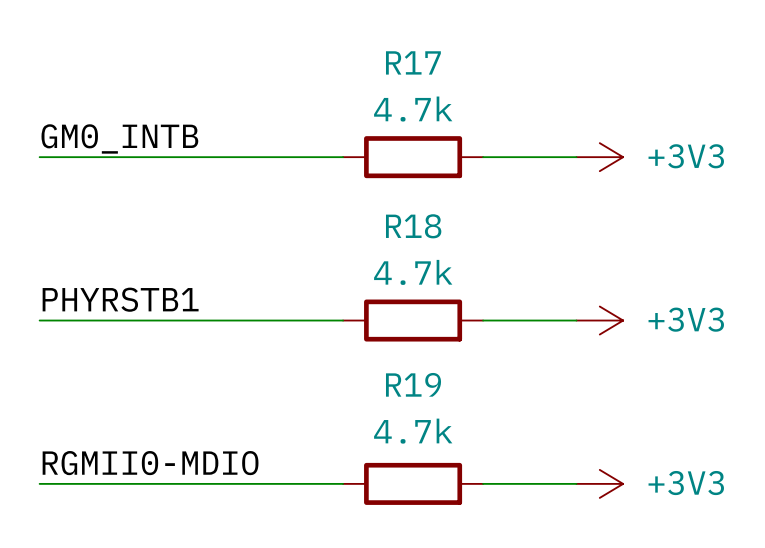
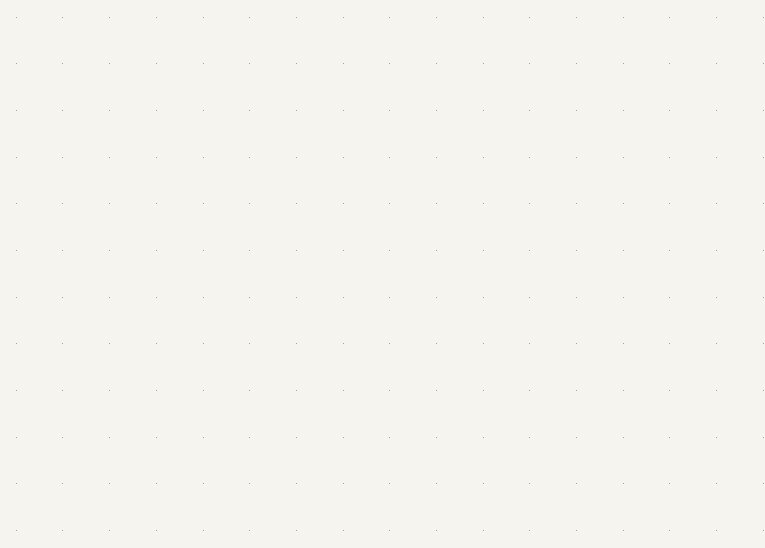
label: GM0_INTB (119, 138) -> none
wire: (39, 157) (343, 157) -> none
R17: 4.7k (413, 157) -> none
wire: (483, 157) (576, 157) -> none
power symbol: +3V3 (599, 157) -> none
label: PHYRSTB1 (120, 299) -> none
wire: (39, 320) (343, 320) -> none
R18: 4.7k (413, 320) -> none
wire: (483, 320) (576, 320) -> none
power symbol: +3V3 (599, 320) -> none
label: RGMII0-MDIO (150, 463) -> none
wire: (39, 483) (343, 483) -> none
R19: 4.7k (413, 483) -> none
wire: (483, 483) (576, 483) -> none
power symbol: +3V3 (599, 483) -> none

